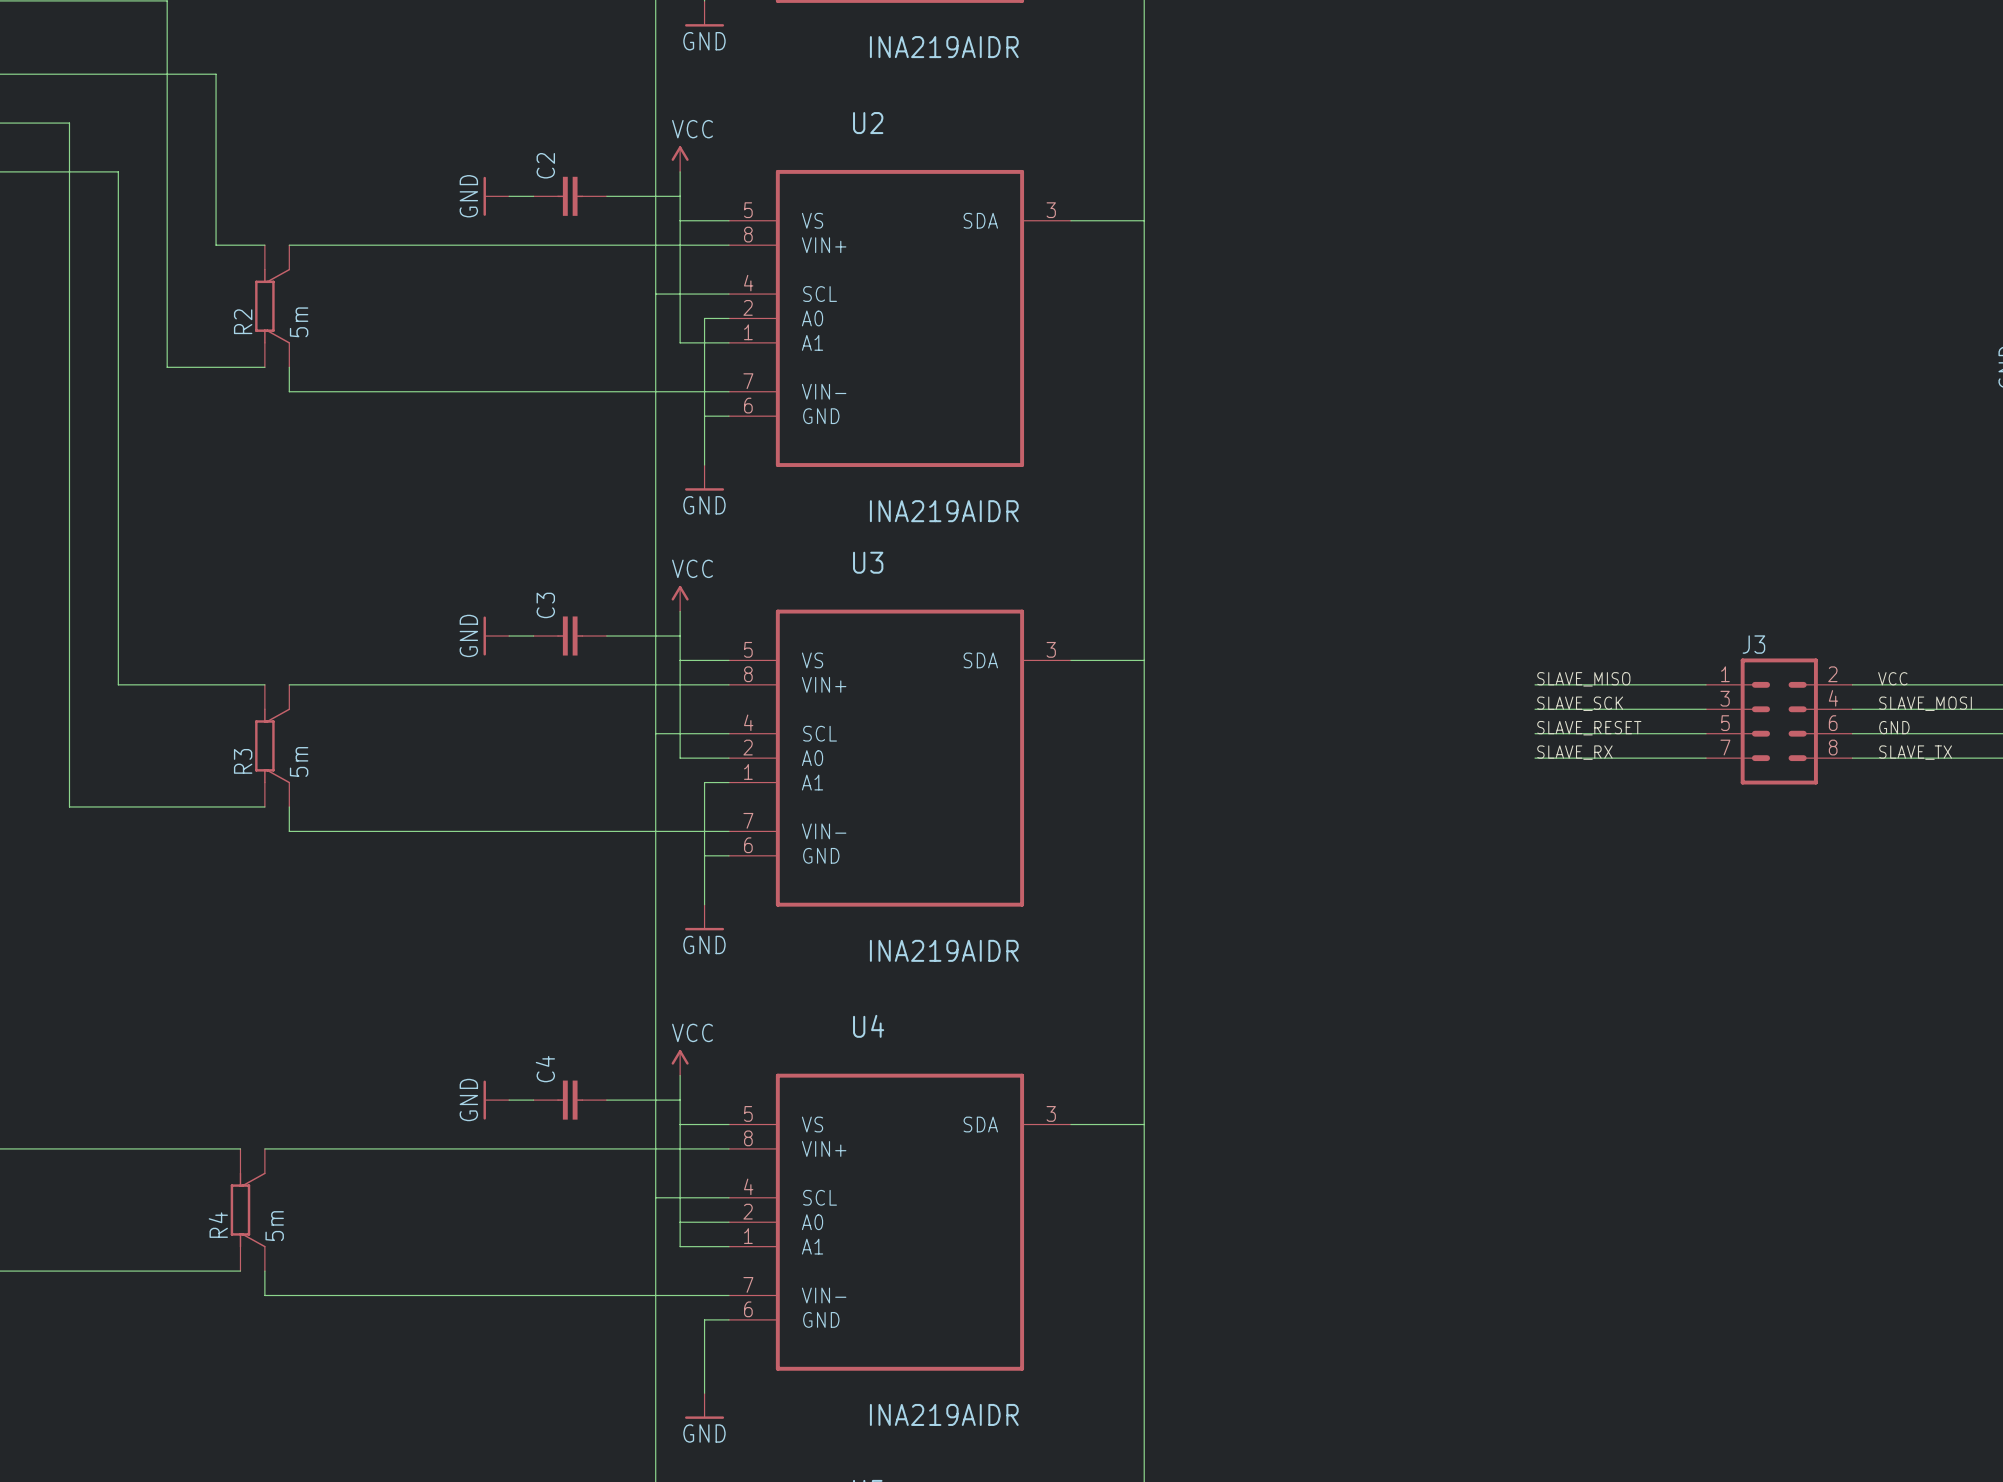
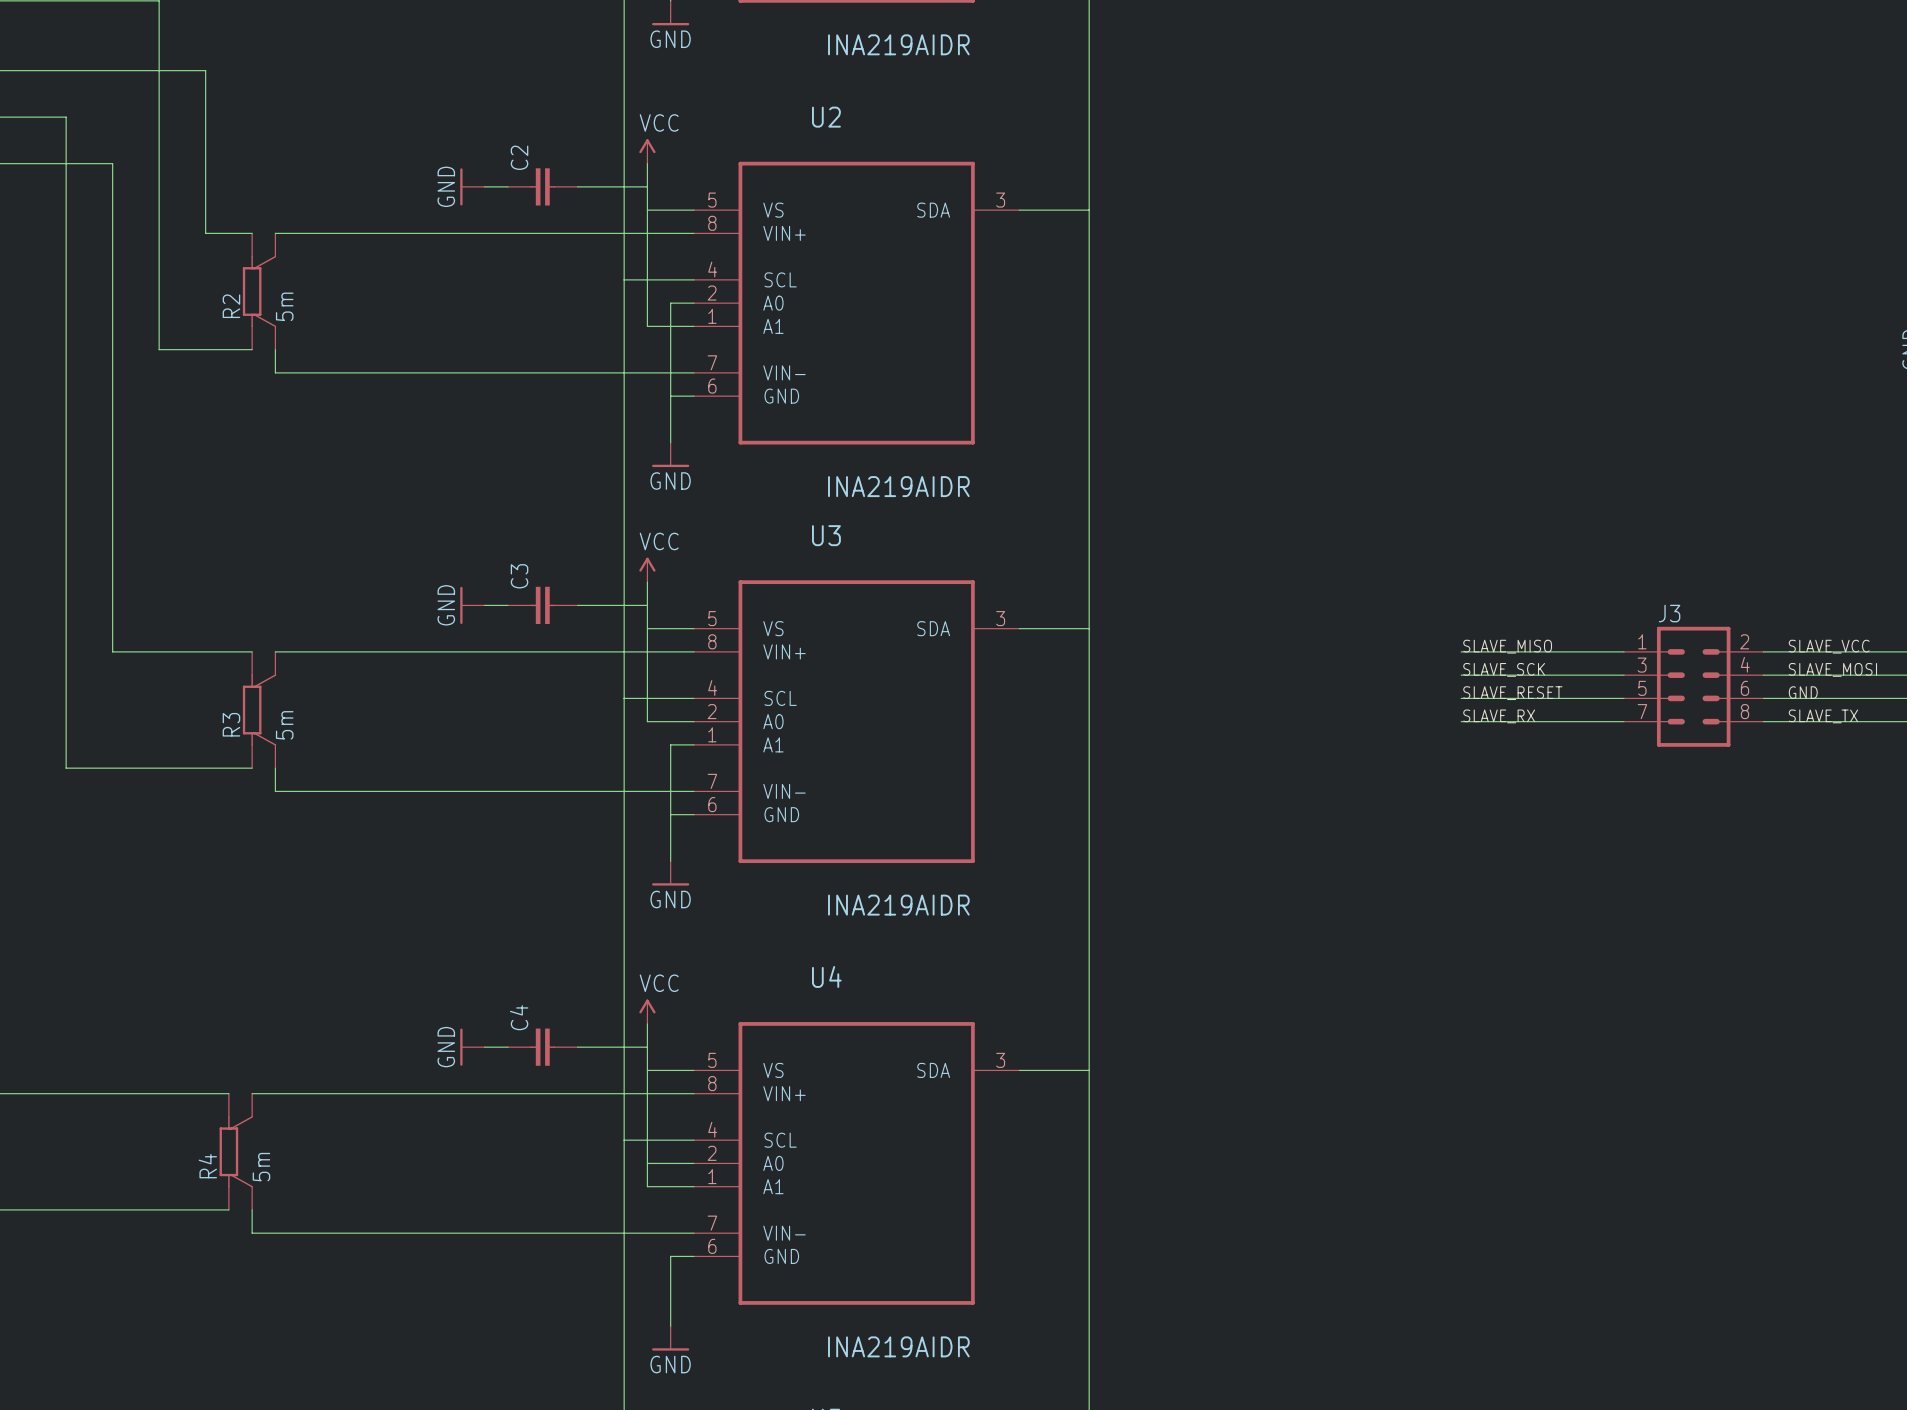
label: VCC (1892, 678) -> SLAVE_VCC (1829, 646)

